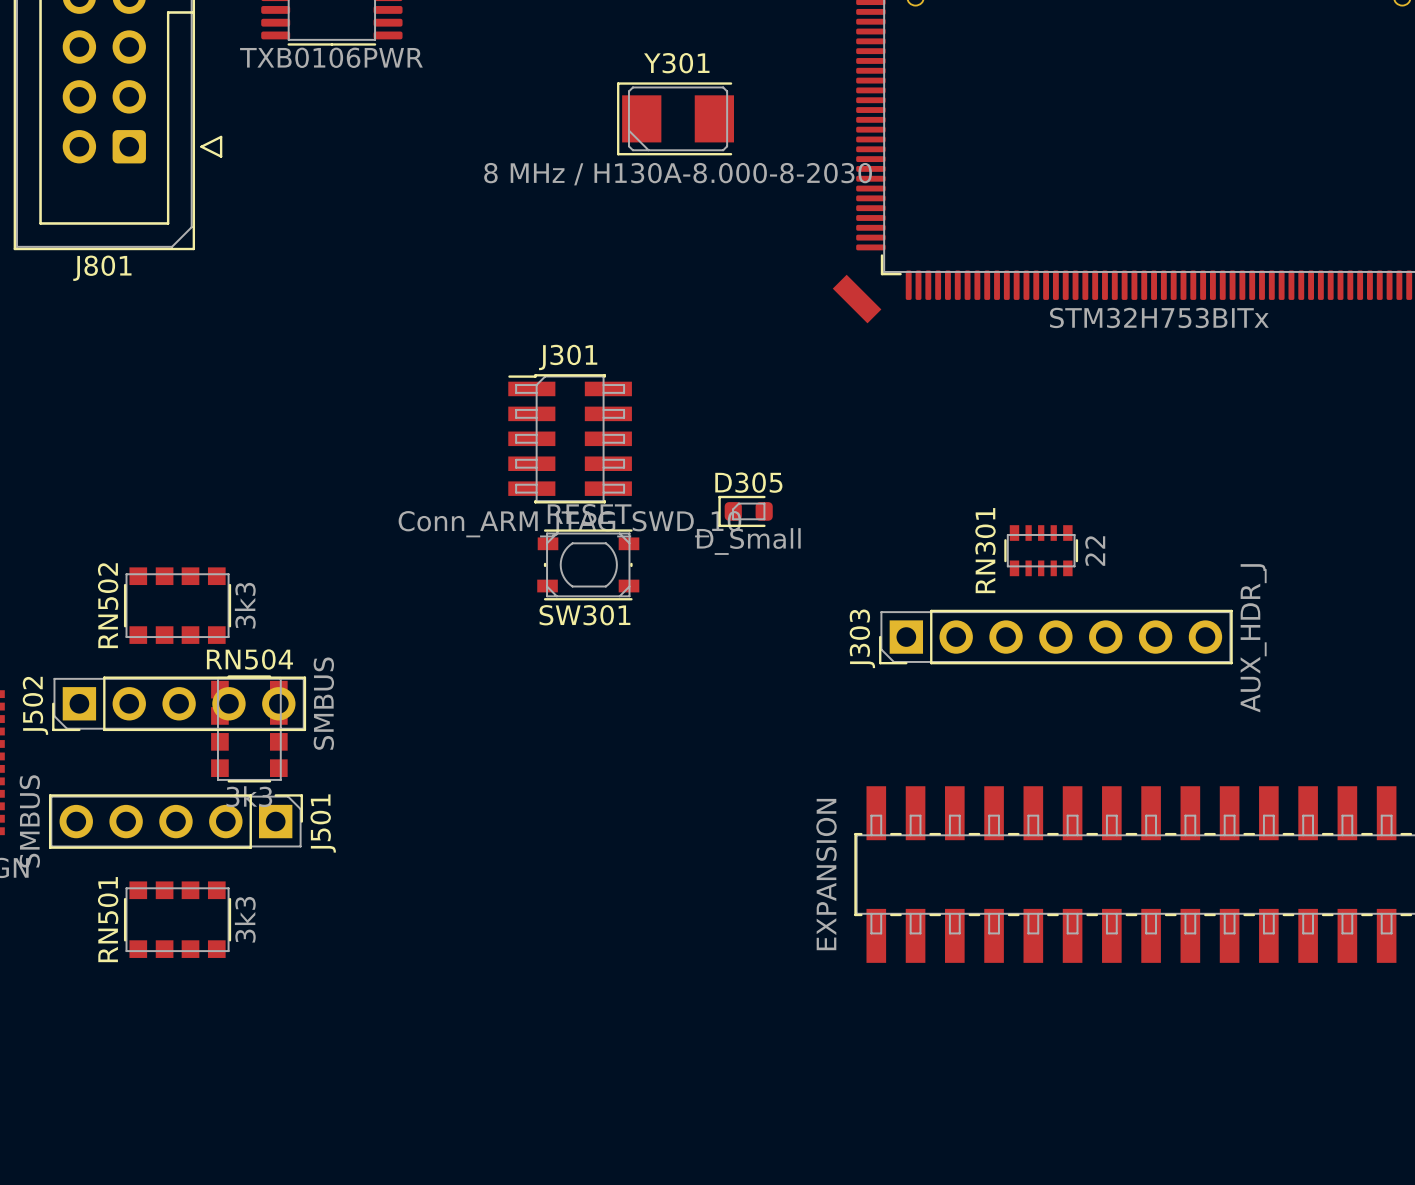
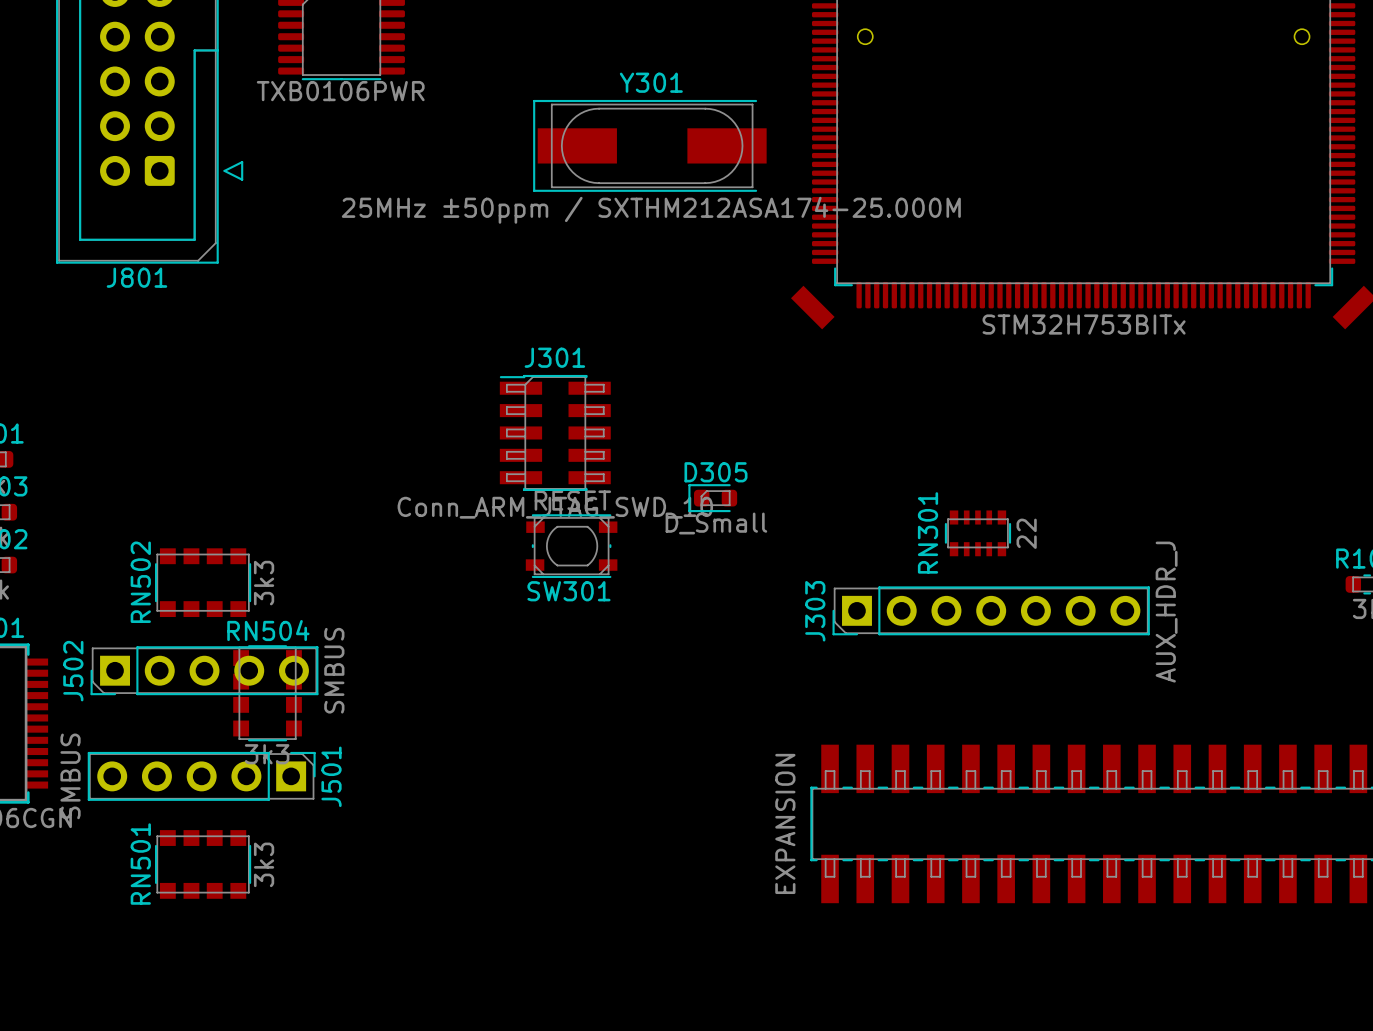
Y301 footprint: [617, 82, 735, 156] -> [533, 99, 767, 192]
Y301 value: 8 MHz / H130A-8.000-8-2030 (678, 174) -> 25MHz ±50ppm / SXTHM212ASA174-25.000M (651, 210)

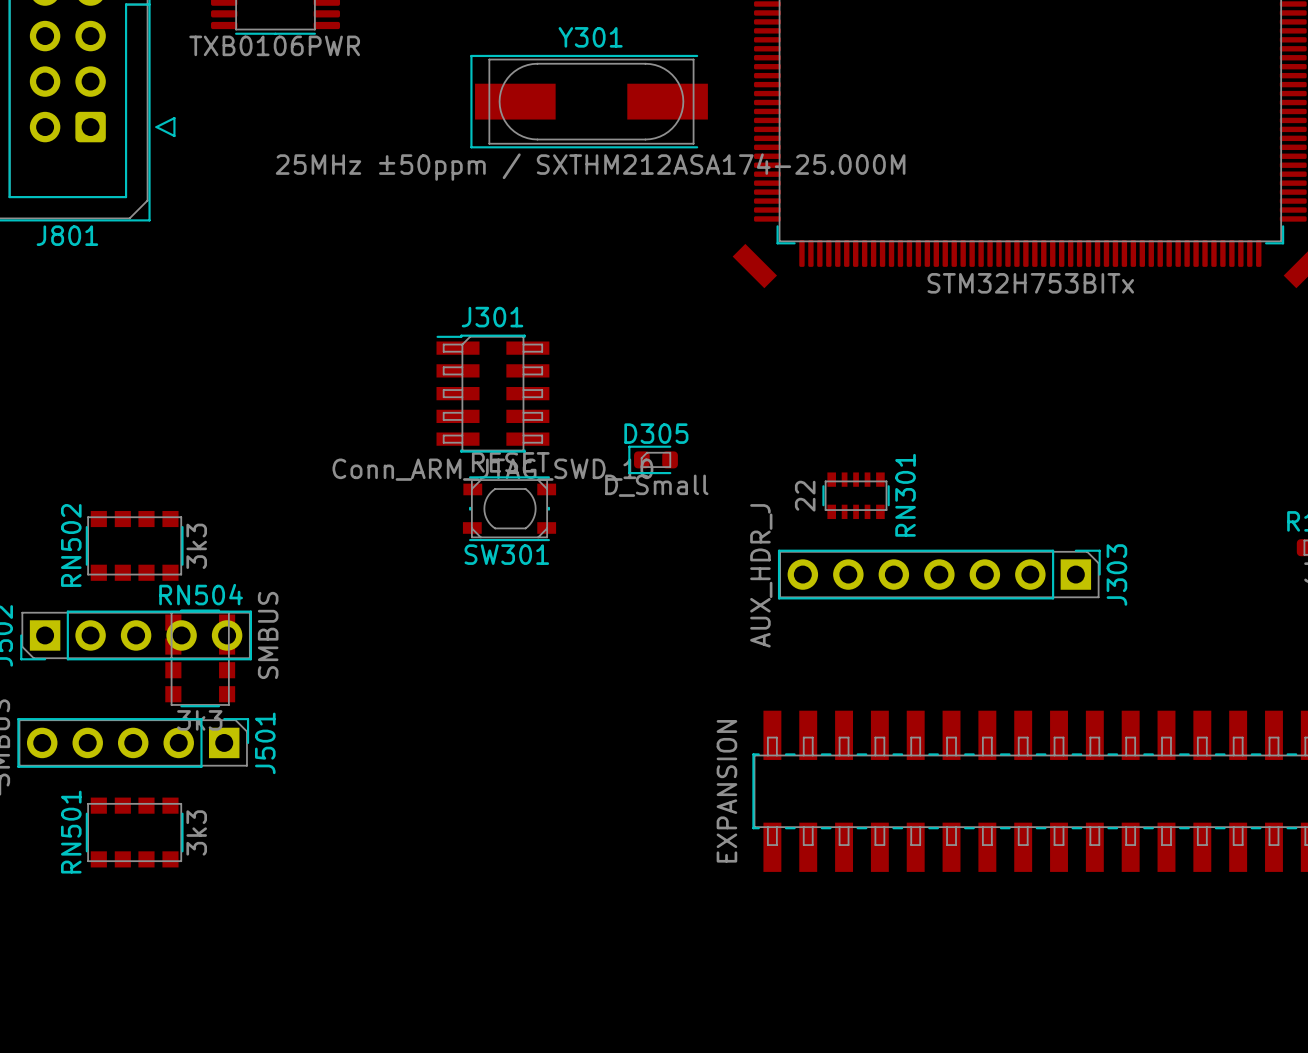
RN301 name position: RN301 (928, 532) -> RN301 (905, 495)
RN301 position: (977, 533) -> (856, 495)
RN301 value position: 22 (1026, 533) -> 22 (805, 496)
J303 rotation: 0° (991, 610) -> 180° (939, 574)

